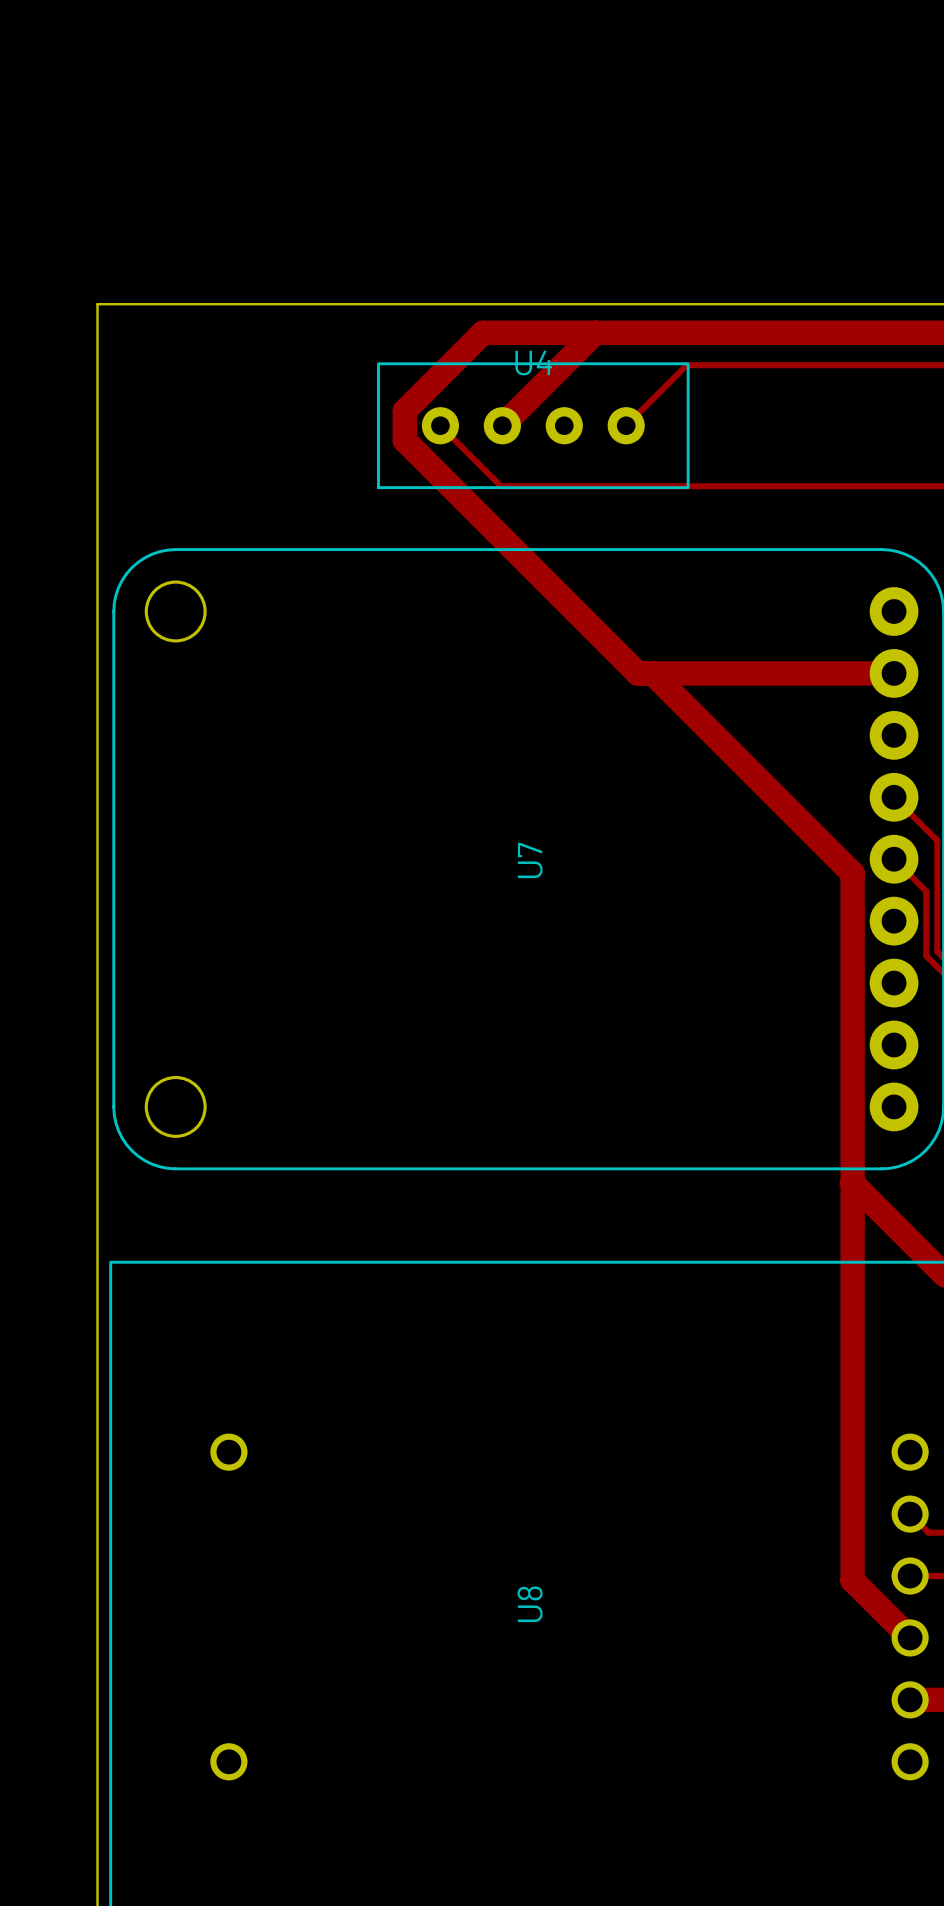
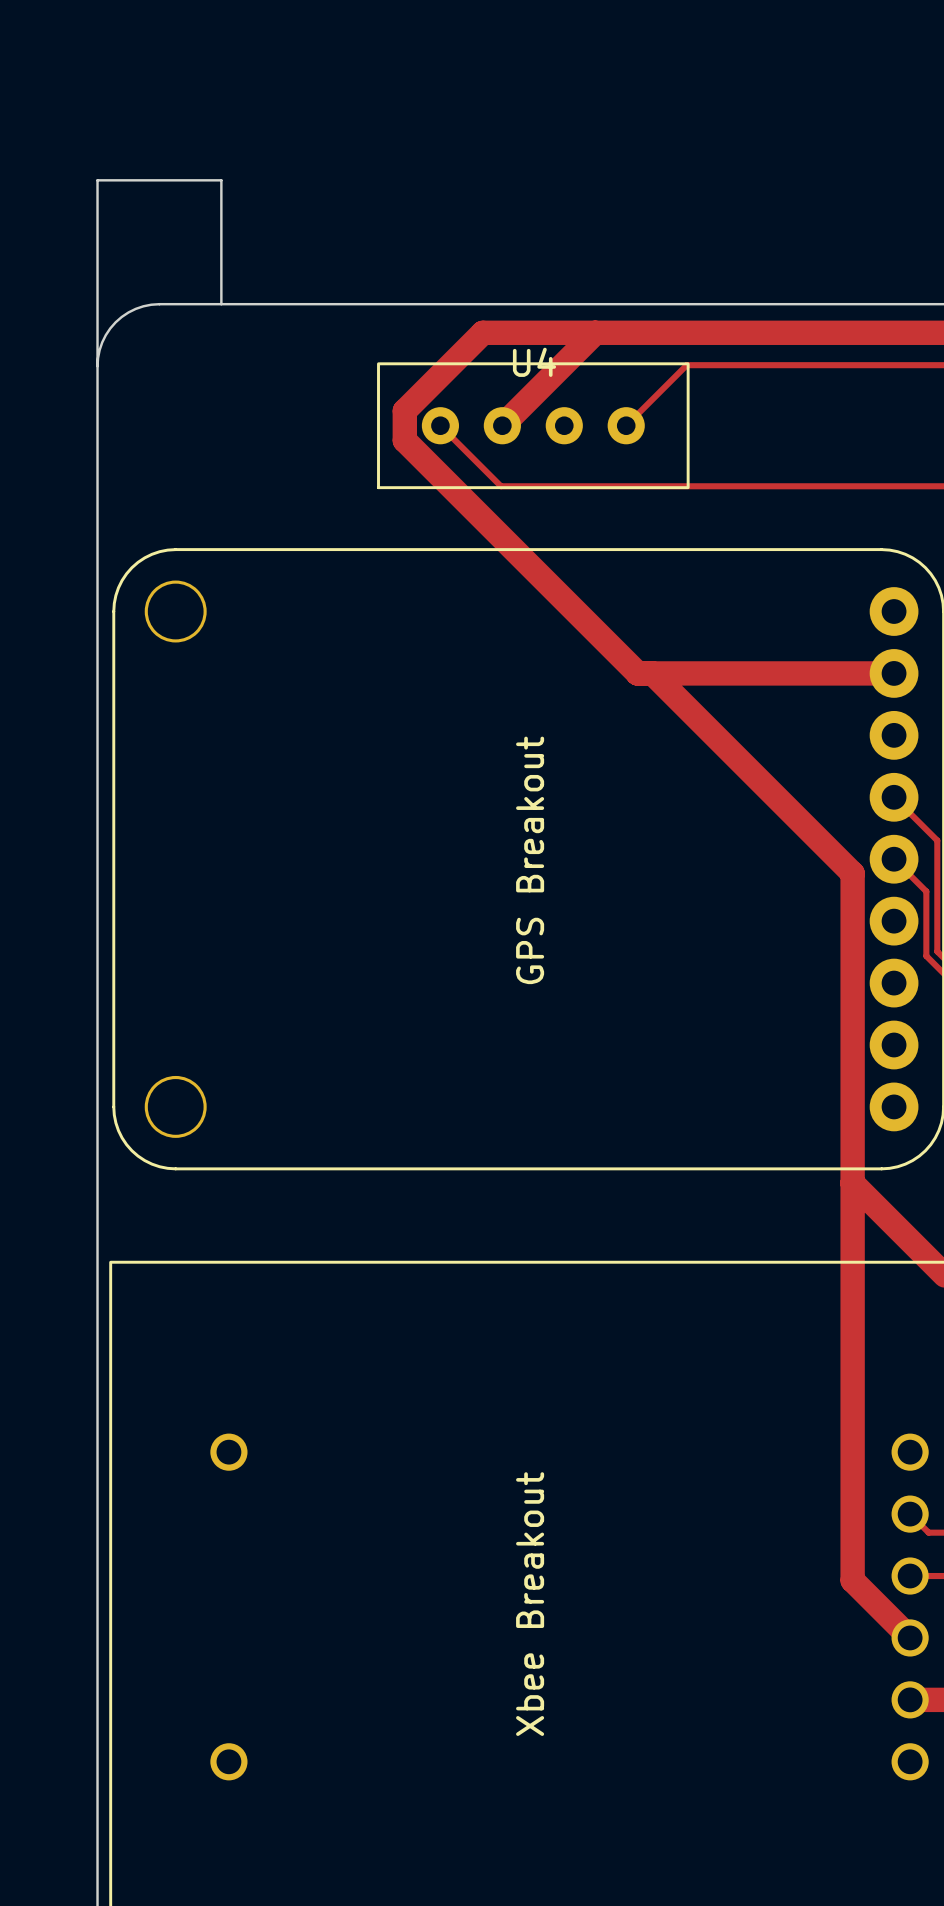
board edge: (97, 304) (159, 304) -> (97, 304) (97, 180) (221, 180) (221, 304)
board edge: none -> (159, 304) (135, 308) (115, 322) (102, 342) (97, 366)
U7 name: U7 (530, 860) -> GPS Breakout (530, 860)
U8 name: U8 (530, 1604) -> Xbee Breakout (530, 1604)

